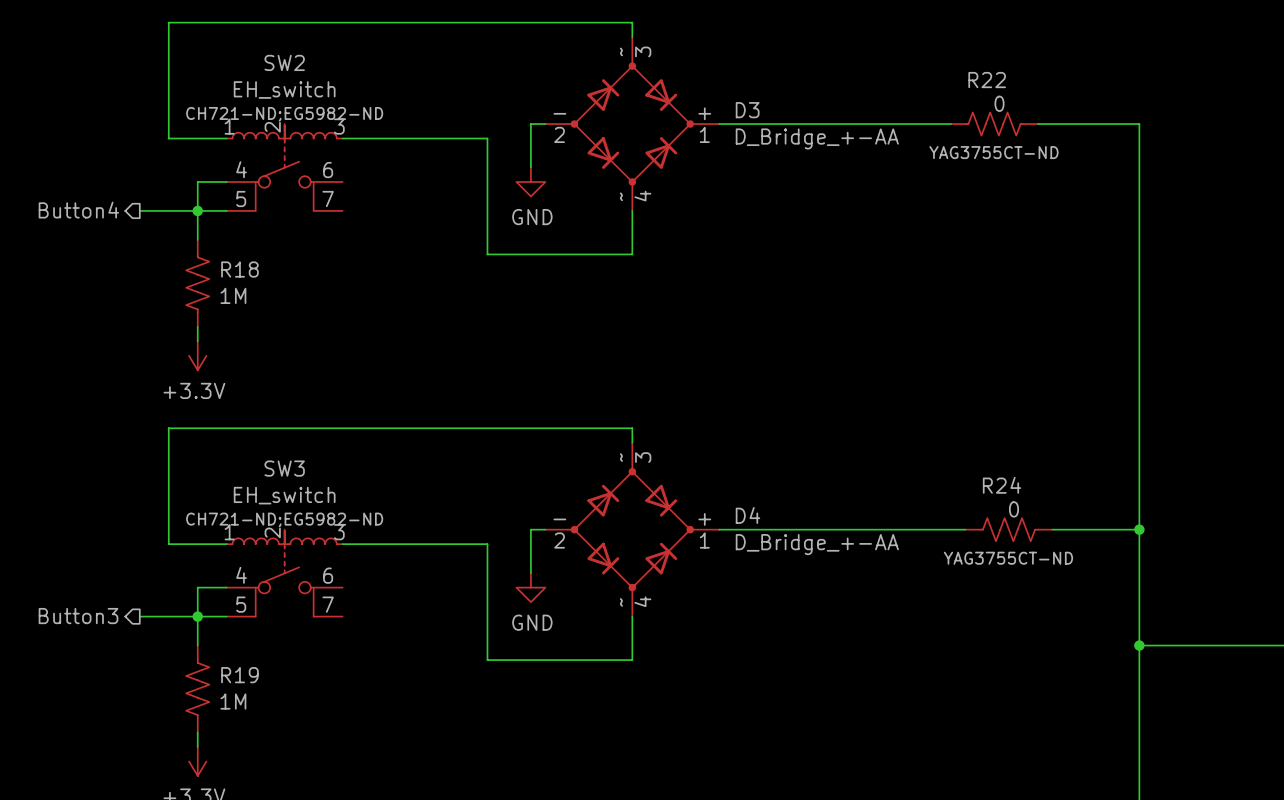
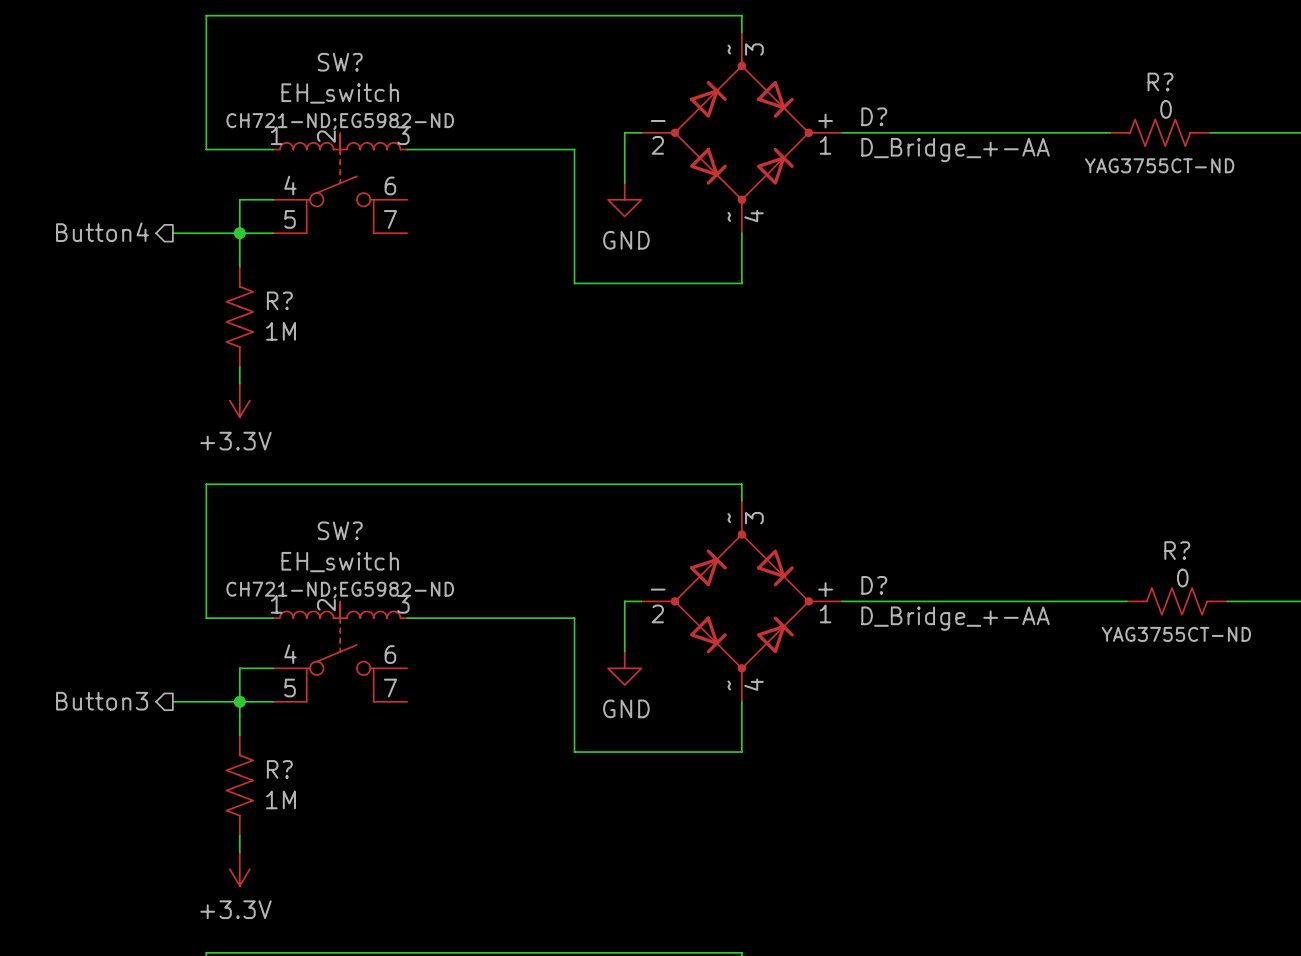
SW2 name: SW2 (284, 62) -> SW? (340, 62)
R22 name: R22 (987, 80) -> R? (1160, 81)
D3 name: D3 (747, 110) -> D? (874, 116)
R18 name: R18 (239, 269) -> R? (279, 300)
SW3 name: SW3 (284, 468) -> SW? (340, 530)
R24 name: R24 (1001, 485) -> R? (1177, 550)
D4 name: D4 (747, 515) -> D? (874, 585)
R19 name: R19 (239, 675) -> R? (279, 769)

